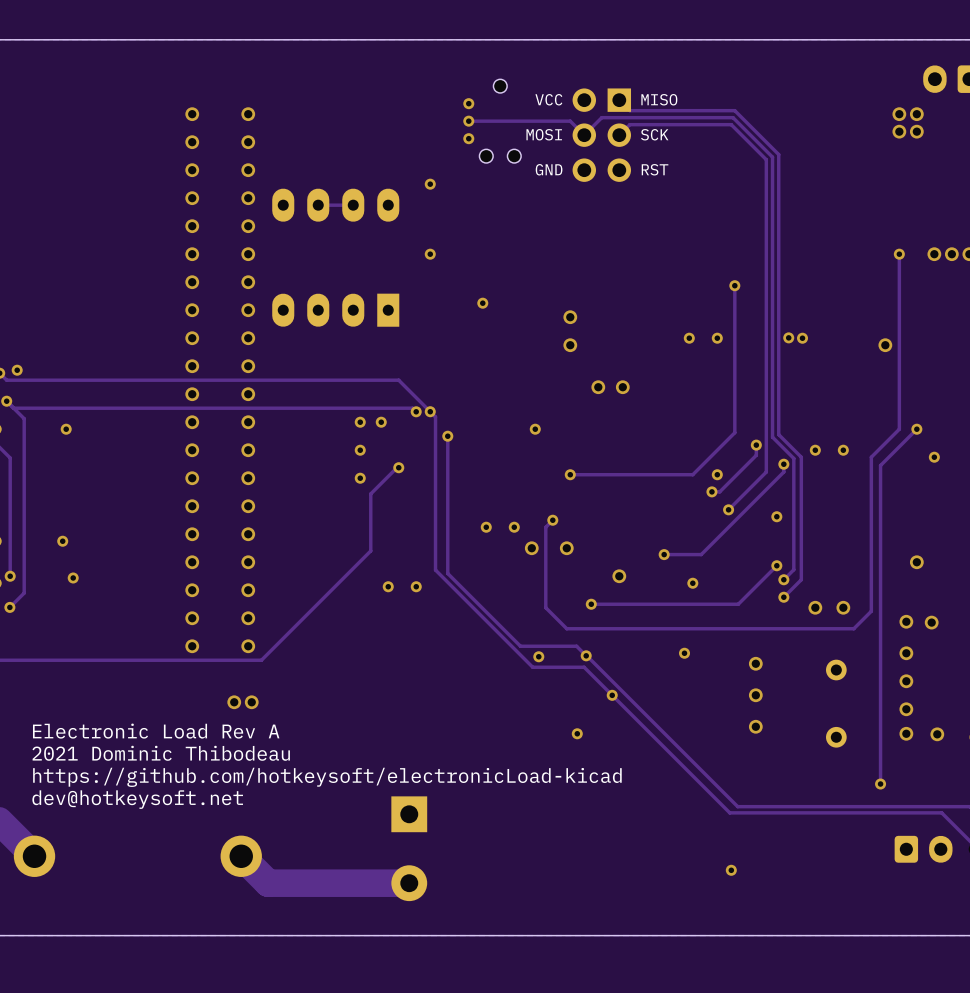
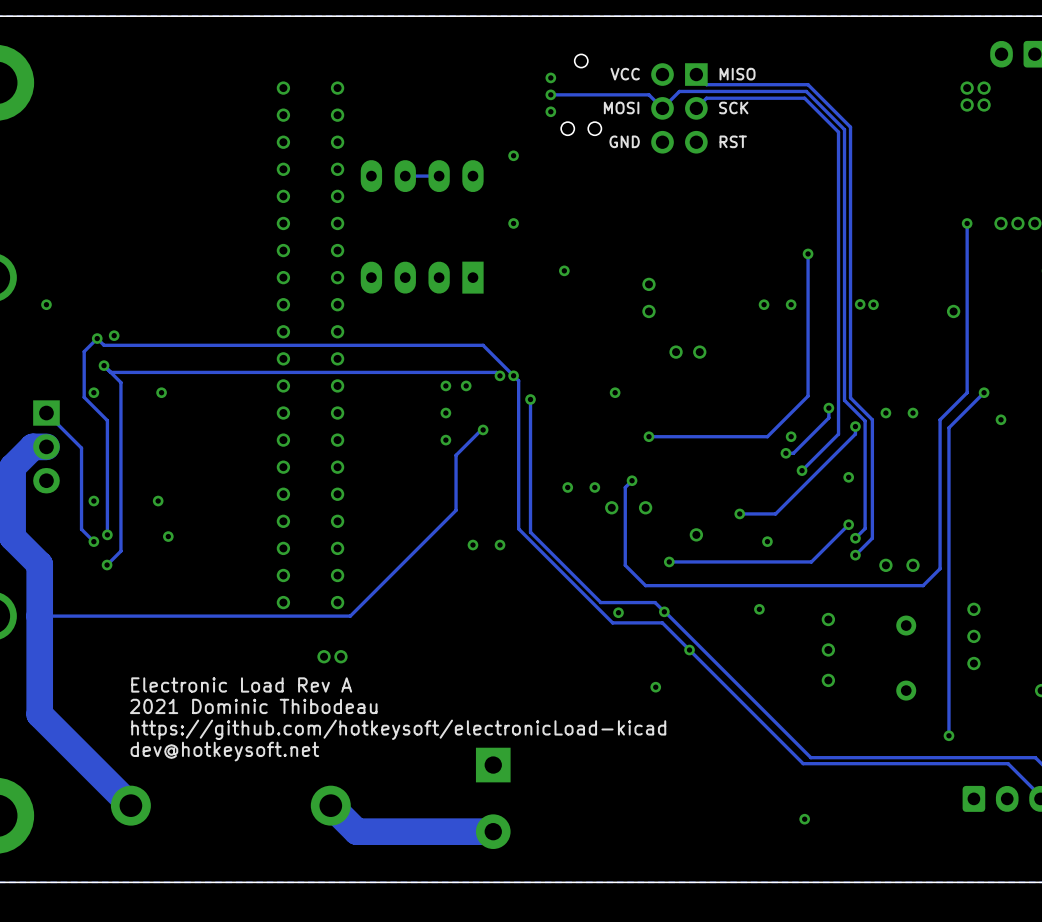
via: (916, 562) -> none
via: (906, 621) -> none
via: (931, 622) -> none
via: (906, 733) -> none
via: (937, 734) -> none

